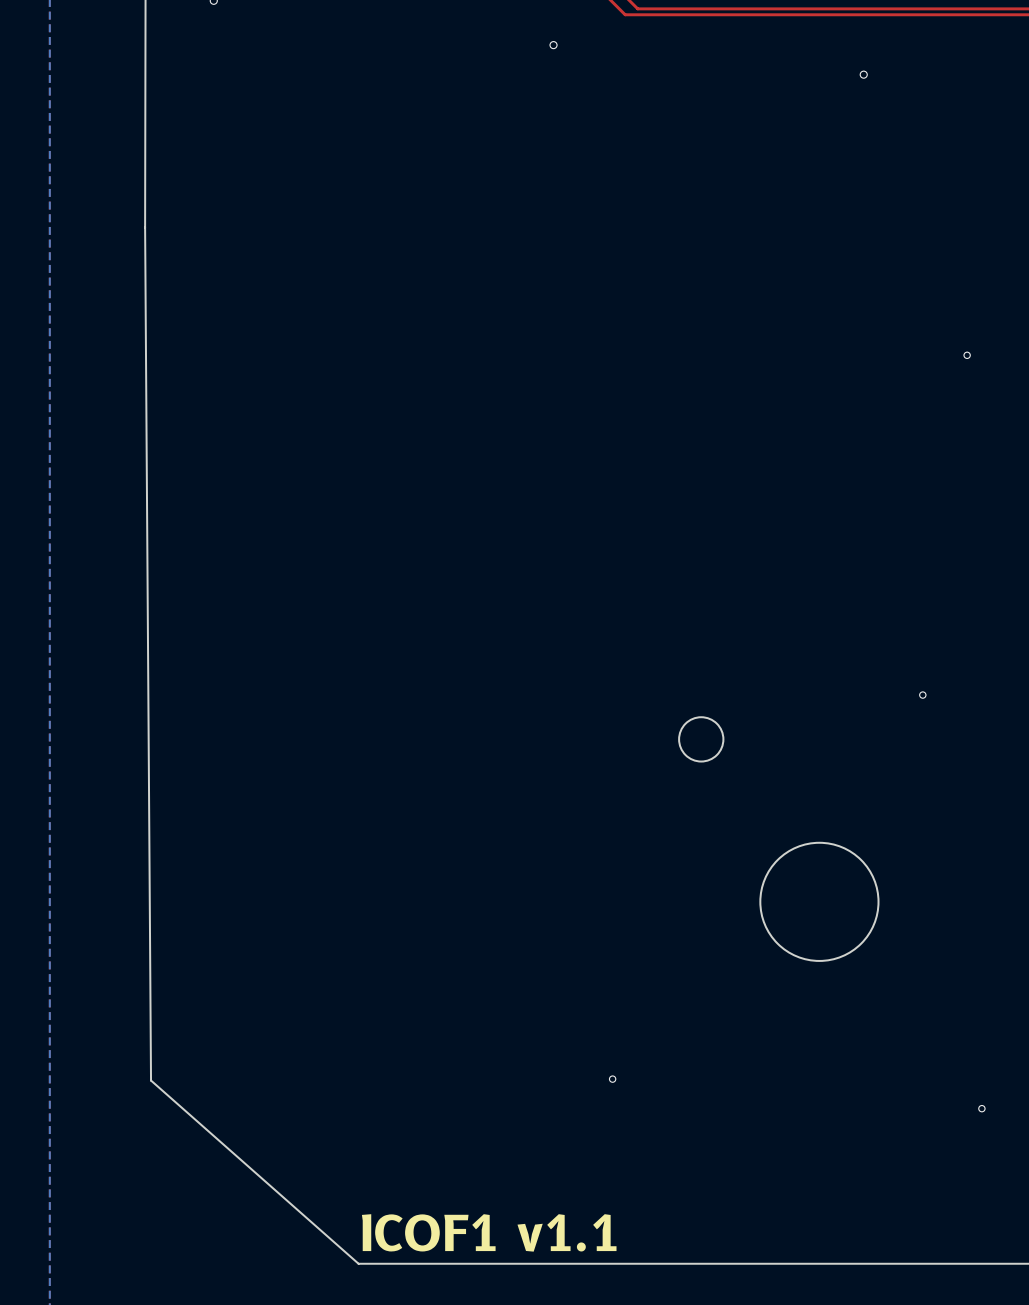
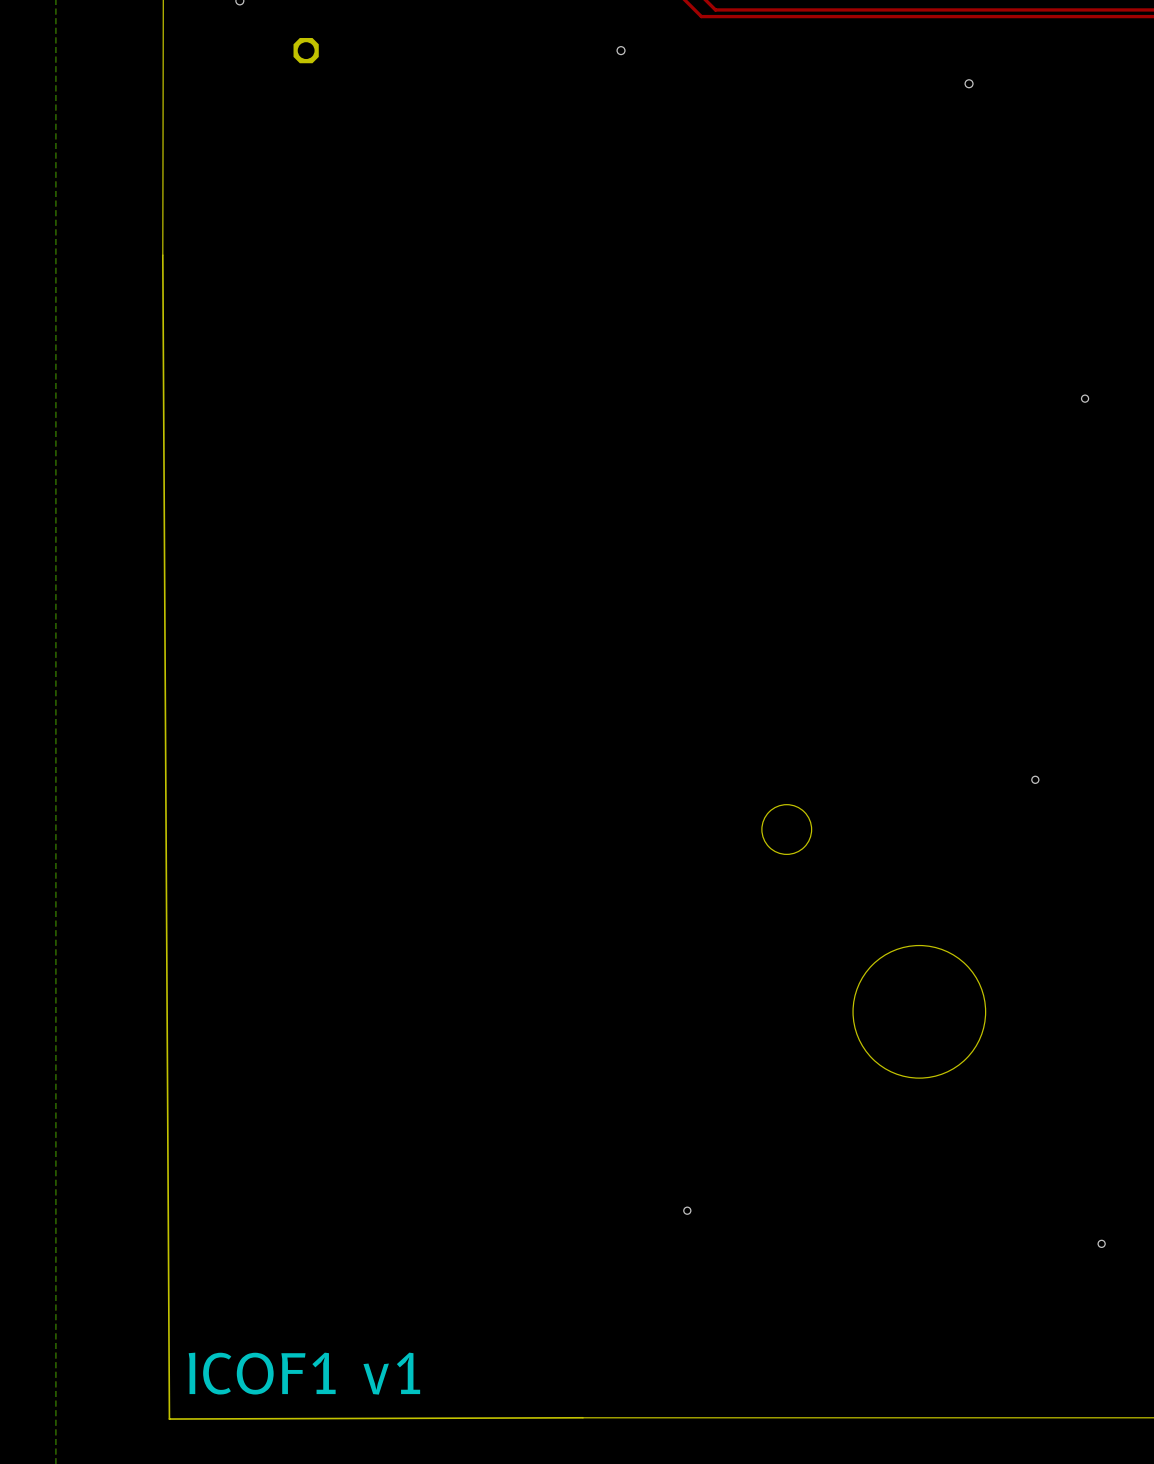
part: none -> (306, 50)
board edge: (145, 227) (151, 1080) (358, 1263) (519, 1263) -> (162, 255) (169, 1419) (582, 1417)
text: ICOF1 v1.1 (489, 1232) -> ICOF1 v1 (304, 1373)

